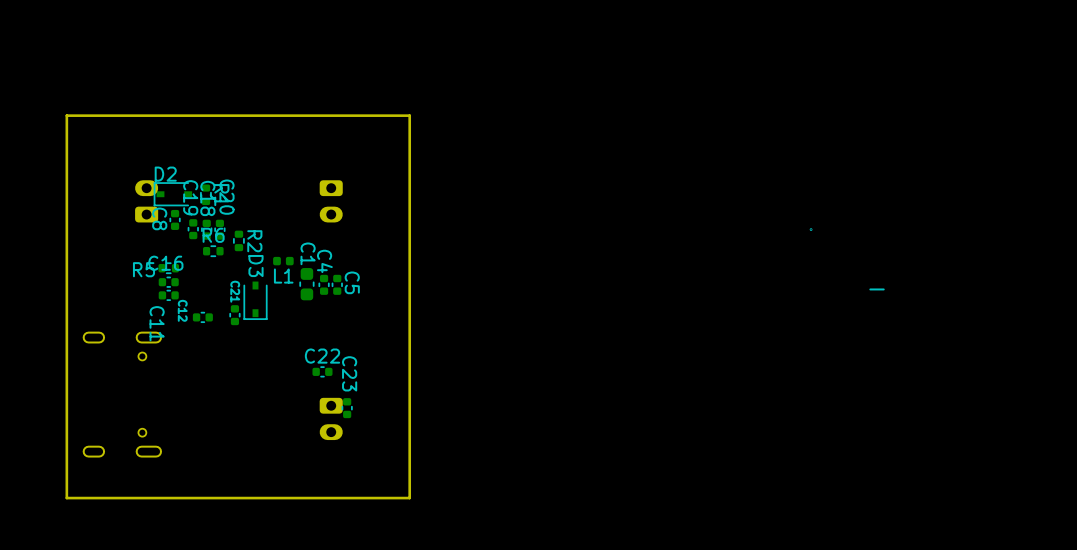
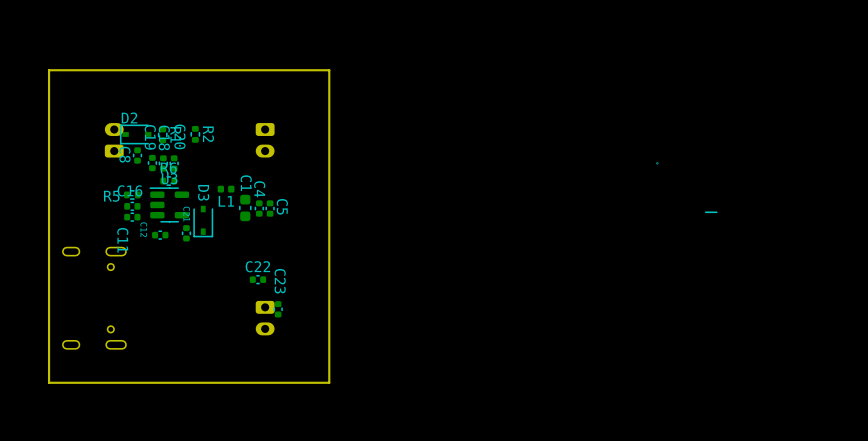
R2 position: (238, 240) -> (195, 134)
U3: none -> (169, 204)

